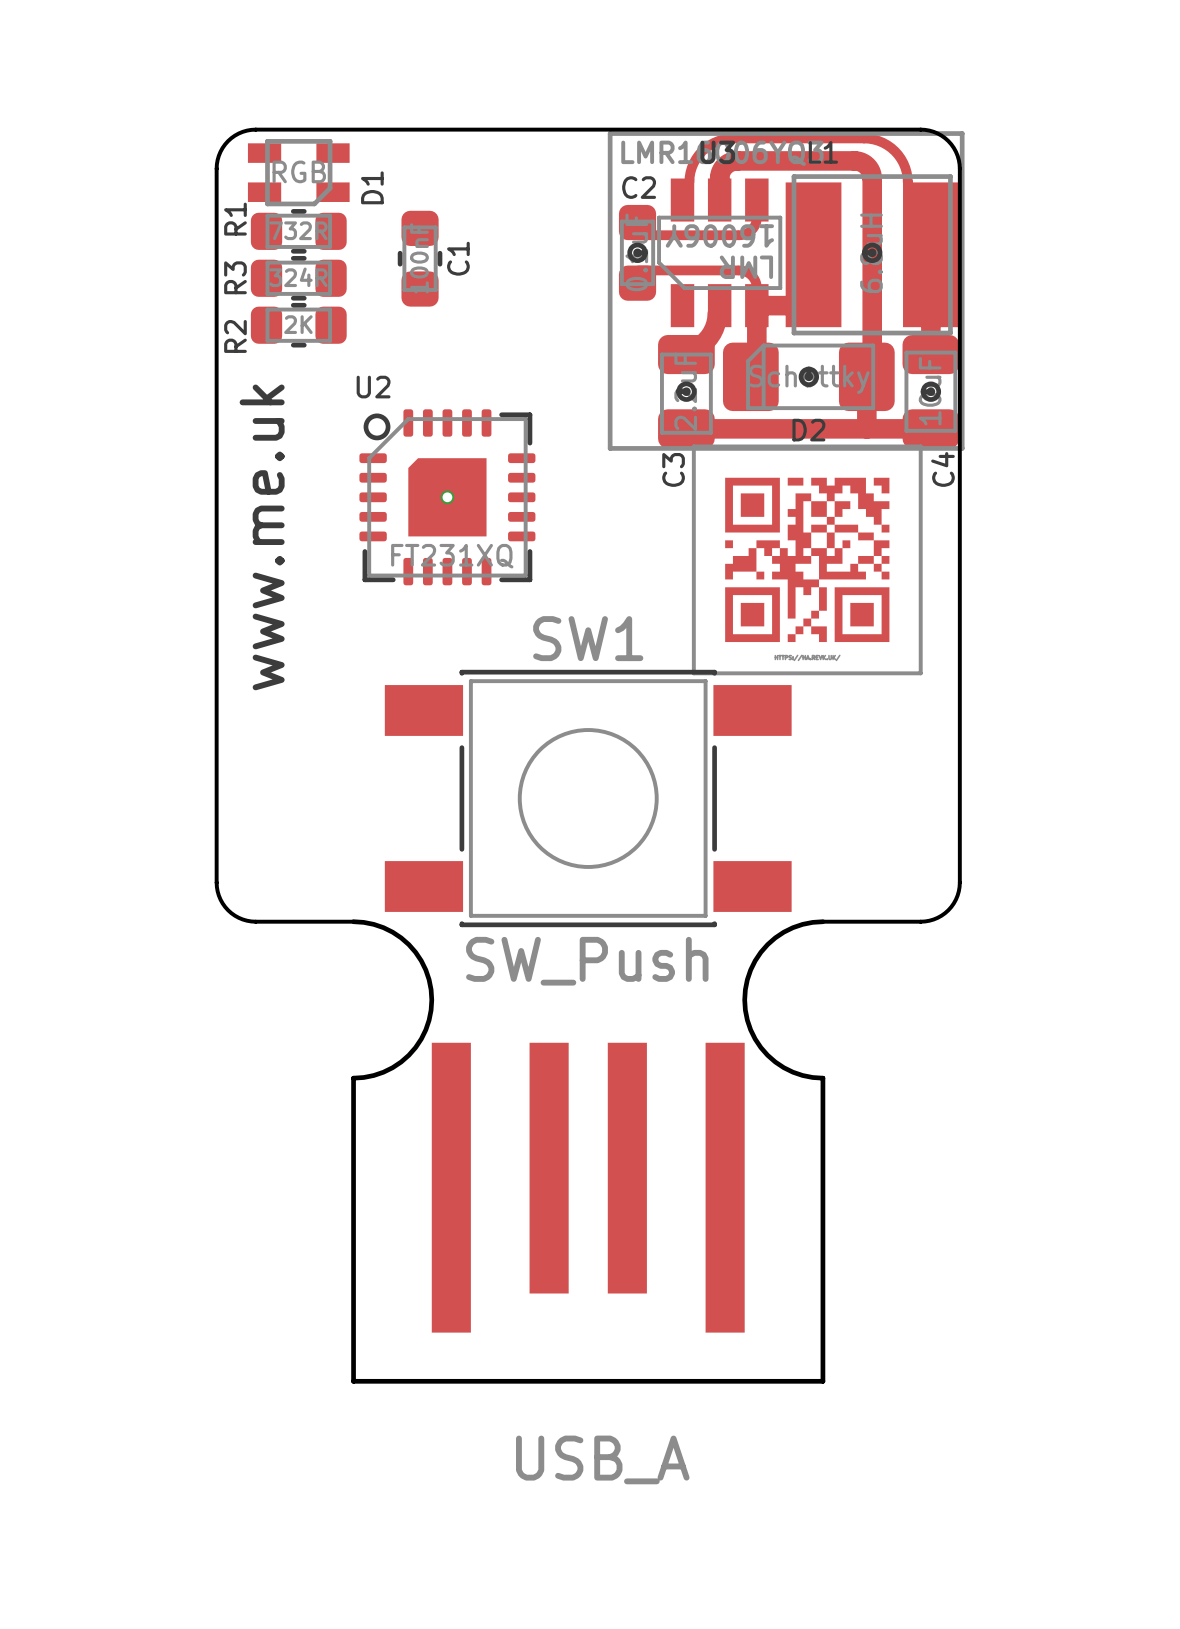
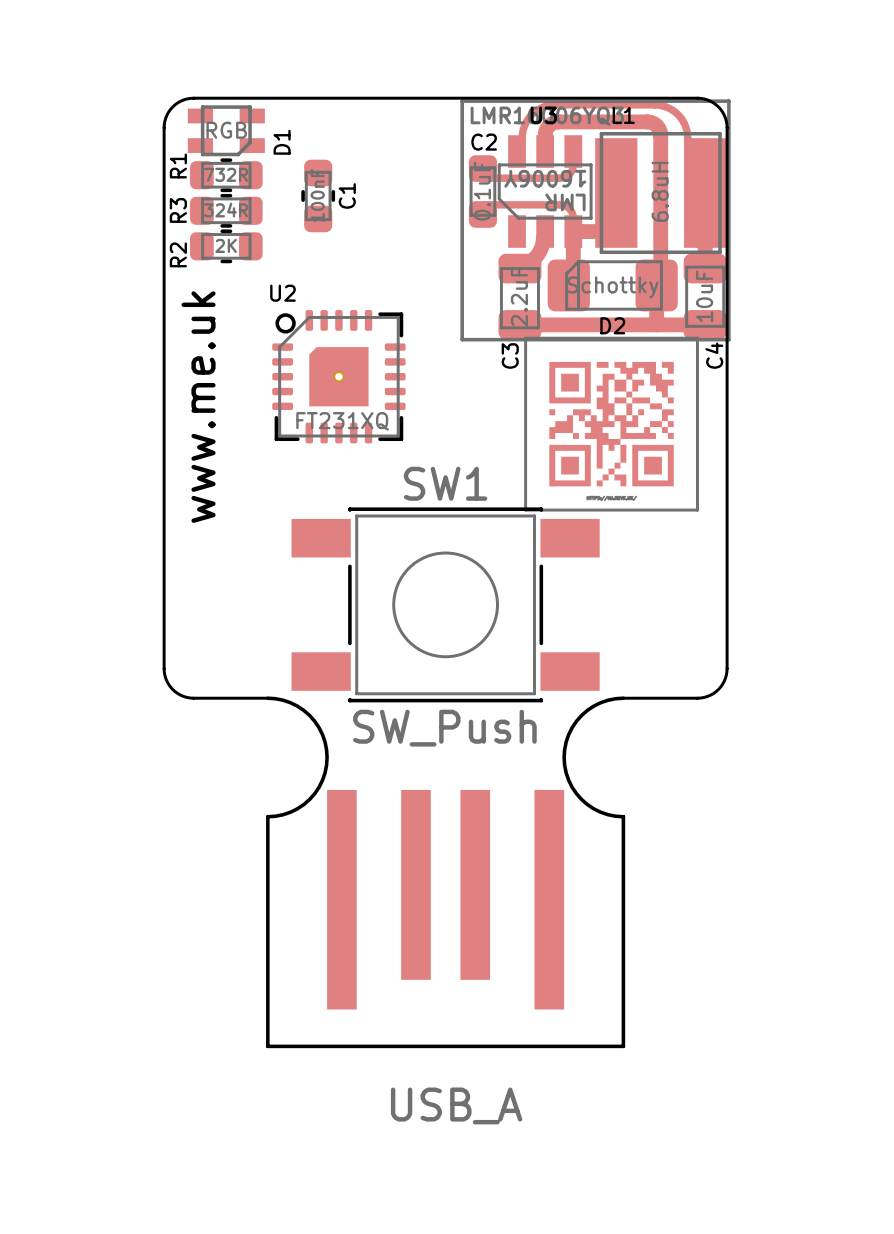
U3 footprint: [607, 131, 965, 451] -> [460, 99, 731, 342]
C2 footprint: [627, 242, 648, 264] -> [471, 133, 497, 221]
L1 footprint: [862, 242, 883, 264] -> [612, 106, 669, 222]
D2 footprint: [798, 366, 820, 388] -> [567, 276, 659, 335]
C3 footprint: [676, 381, 697, 402] -> [501, 266, 529, 369]
C4 footprint: [920, 381, 942, 402] -> [696, 270, 724, 369]

